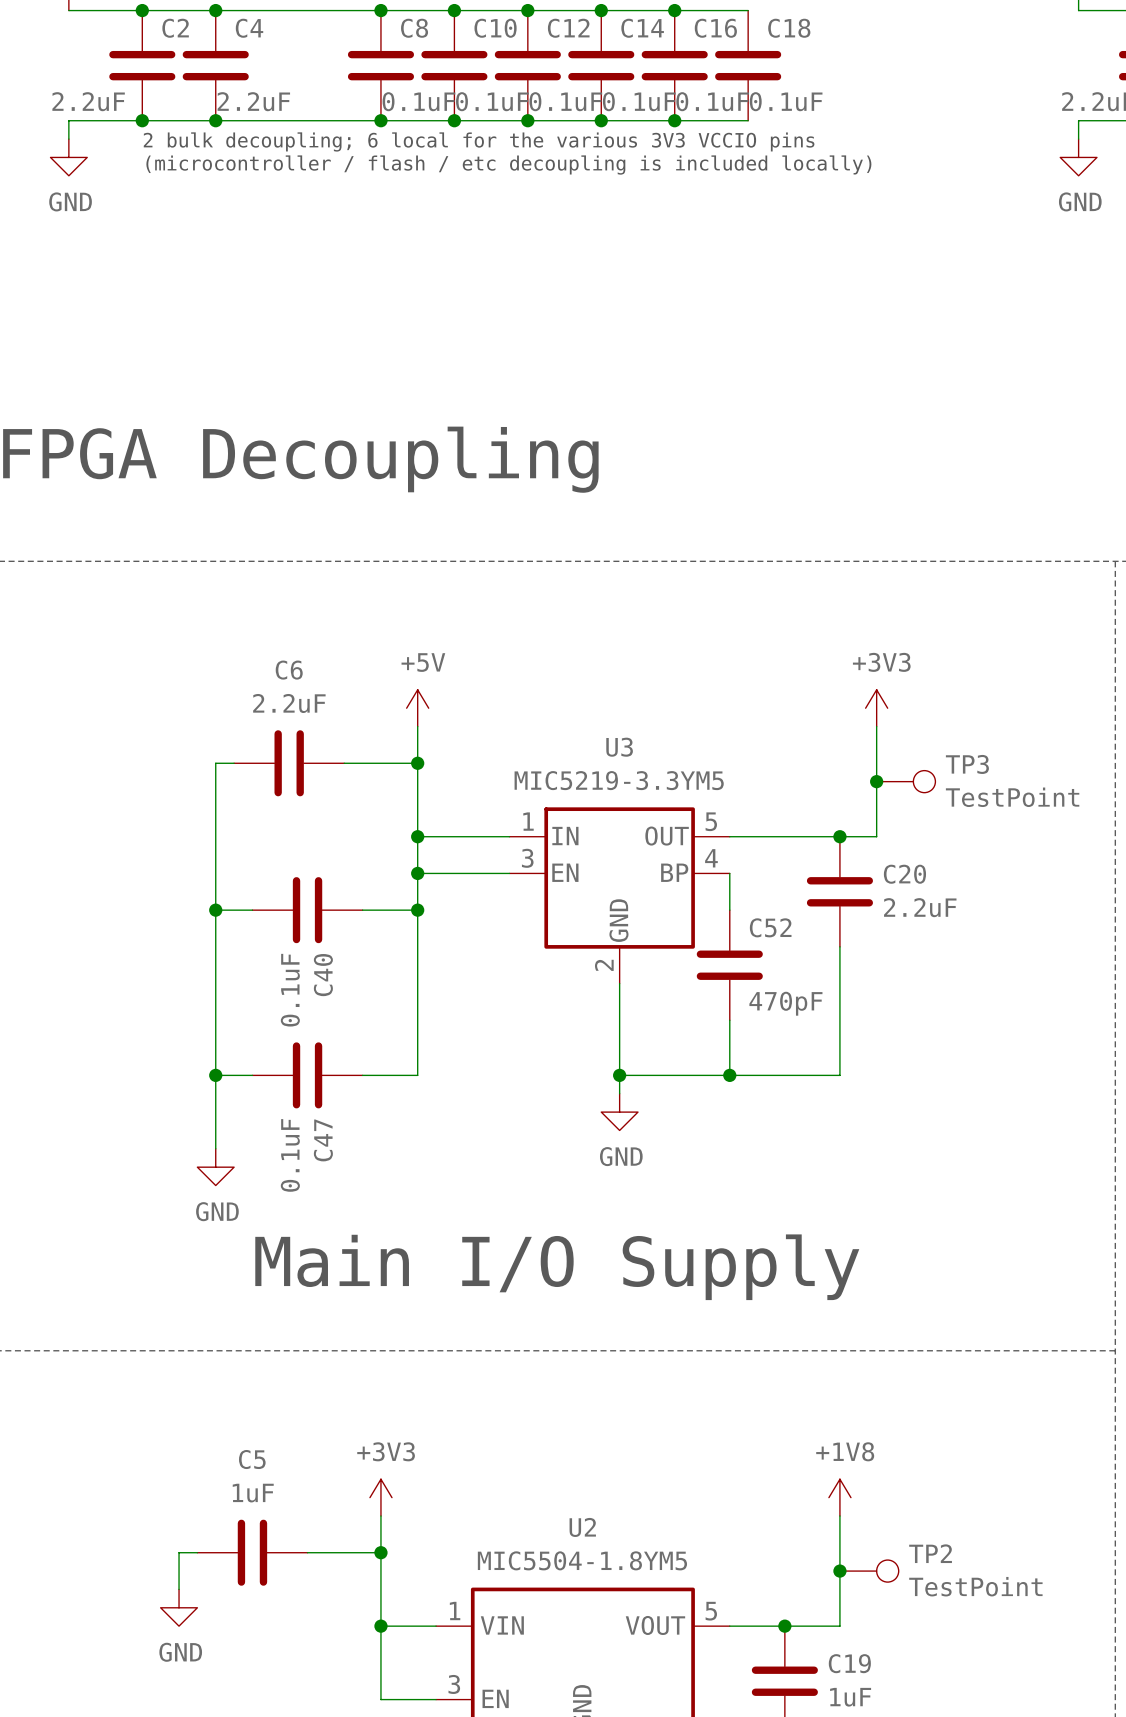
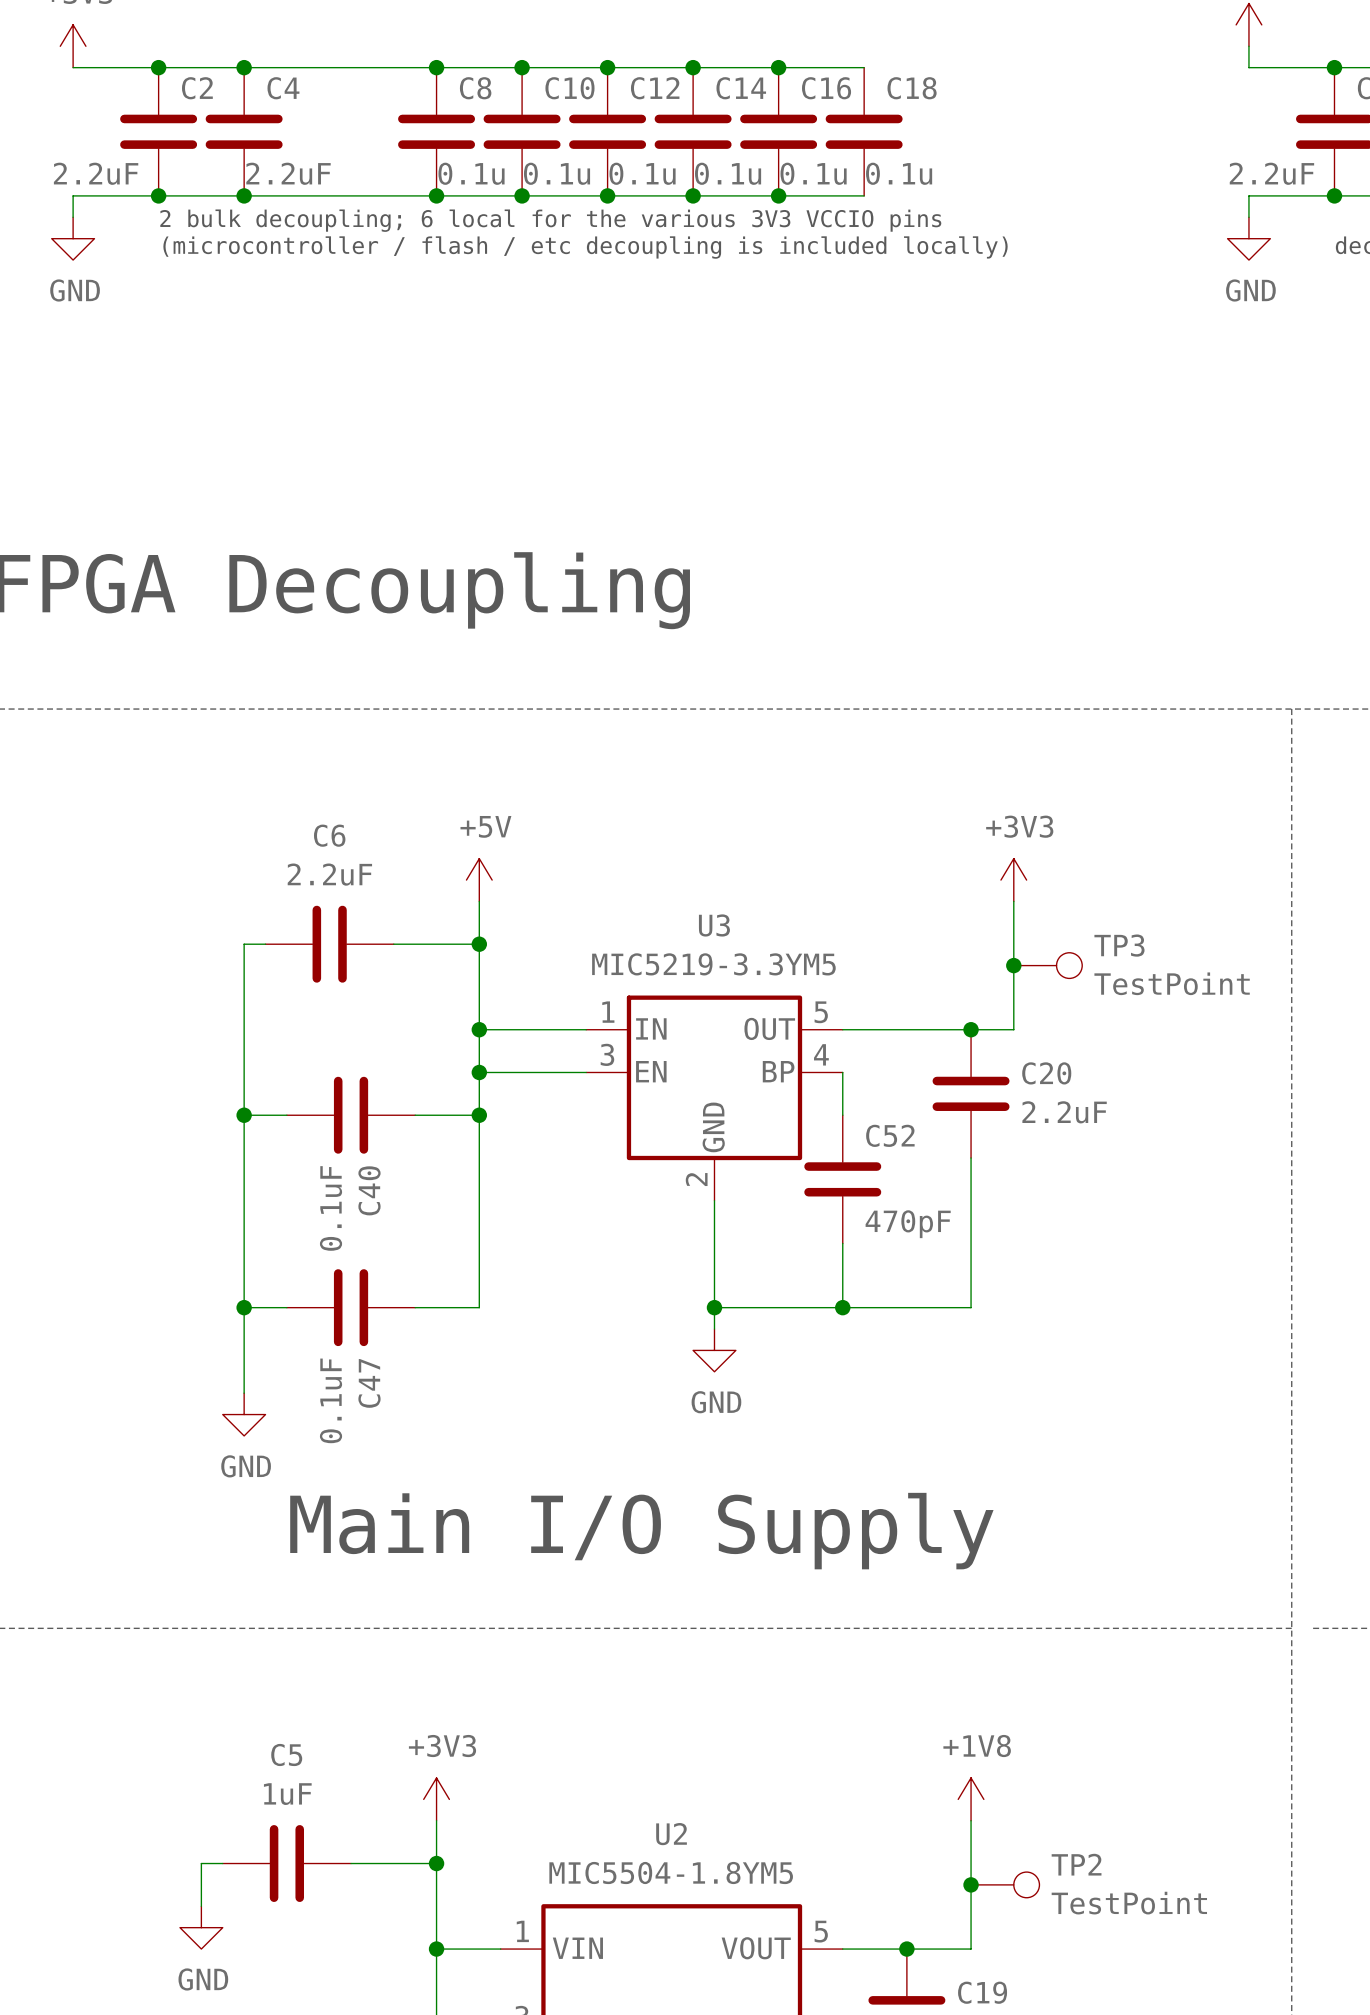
C8 value: 0.1uF (418, 101) -> 0.1u (471, 173)
C10 value: 0.1uF (492, 101) -> 0.1u (557, 173)
C12 value: 0.1uF (565, 101) -> 0.1u (642, 173)
C14 value: 0.1uF (639, 101) -> 0.1u (728, 173)
C16 value: 0.1uF (712, 101) -> 0.1u (813, 173)
C18 value: 0.1uF (786, 101) -> 0.1u (899, 173)

